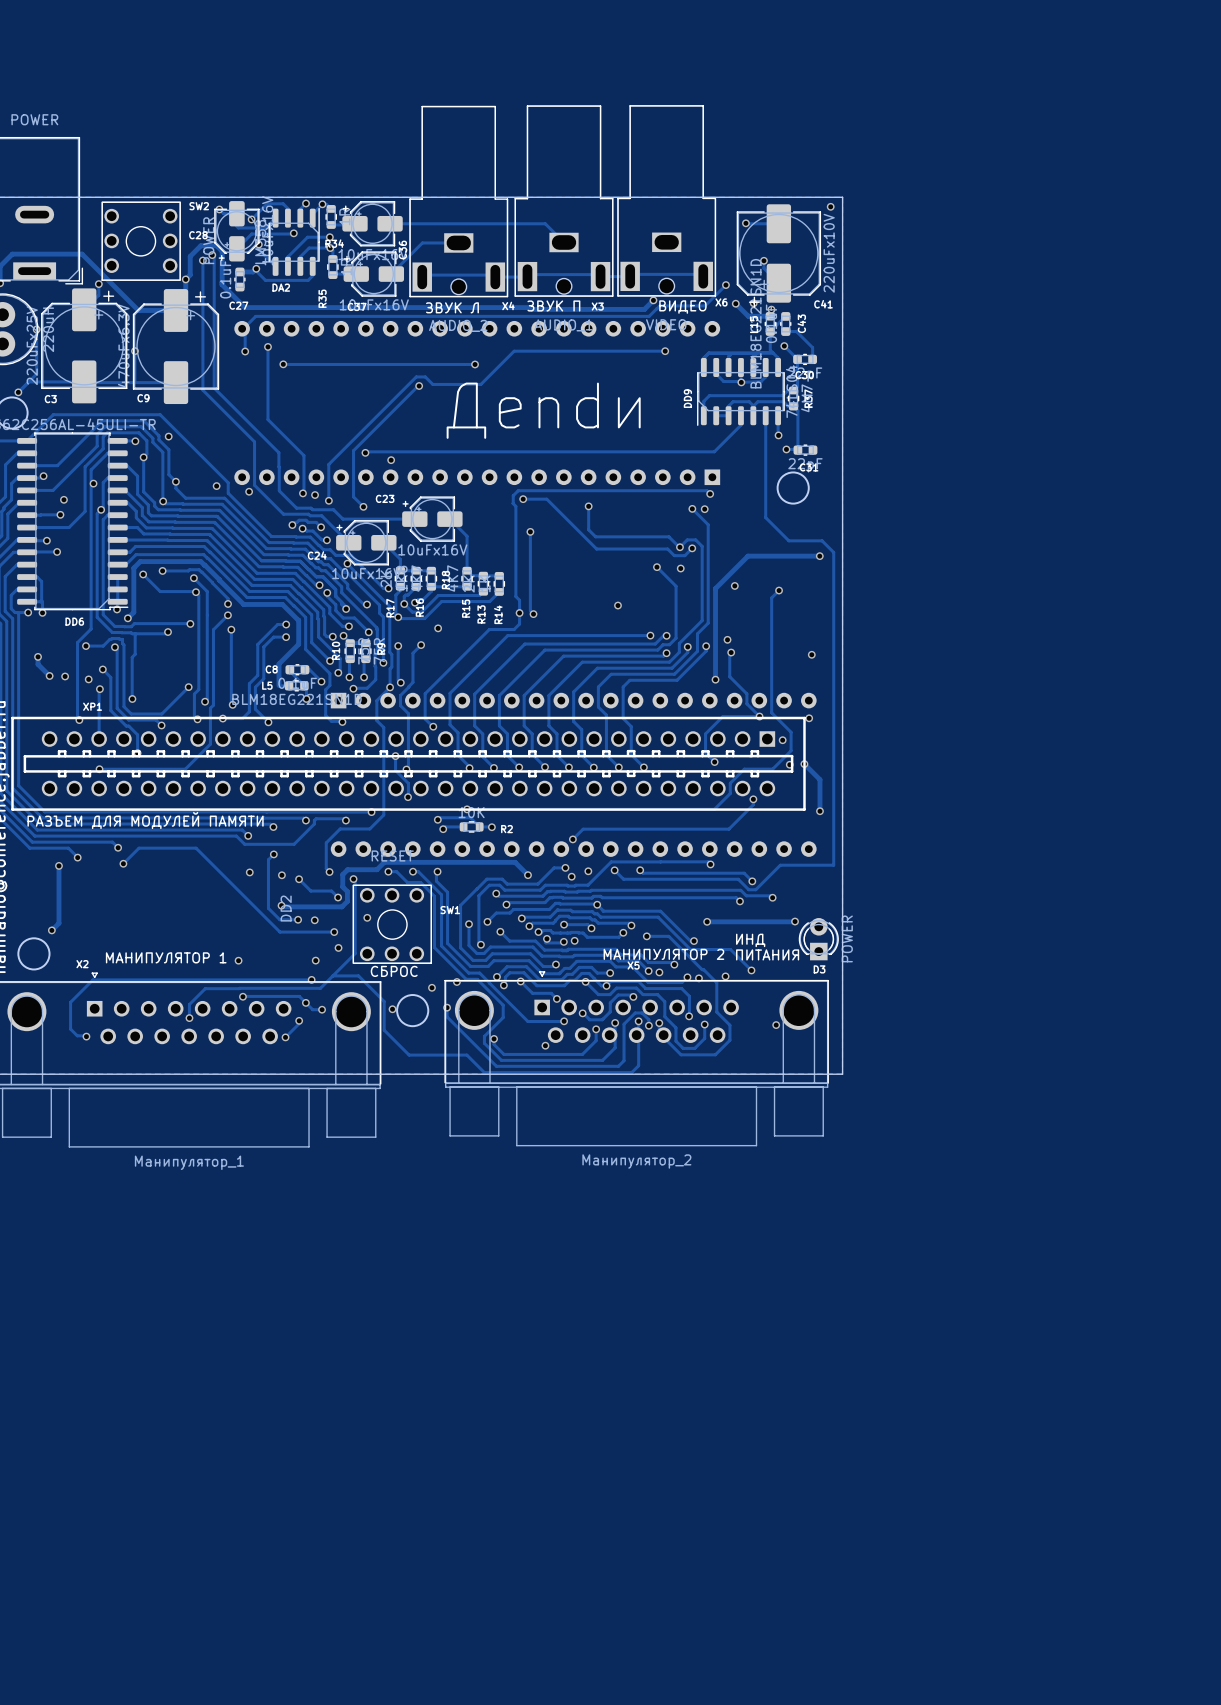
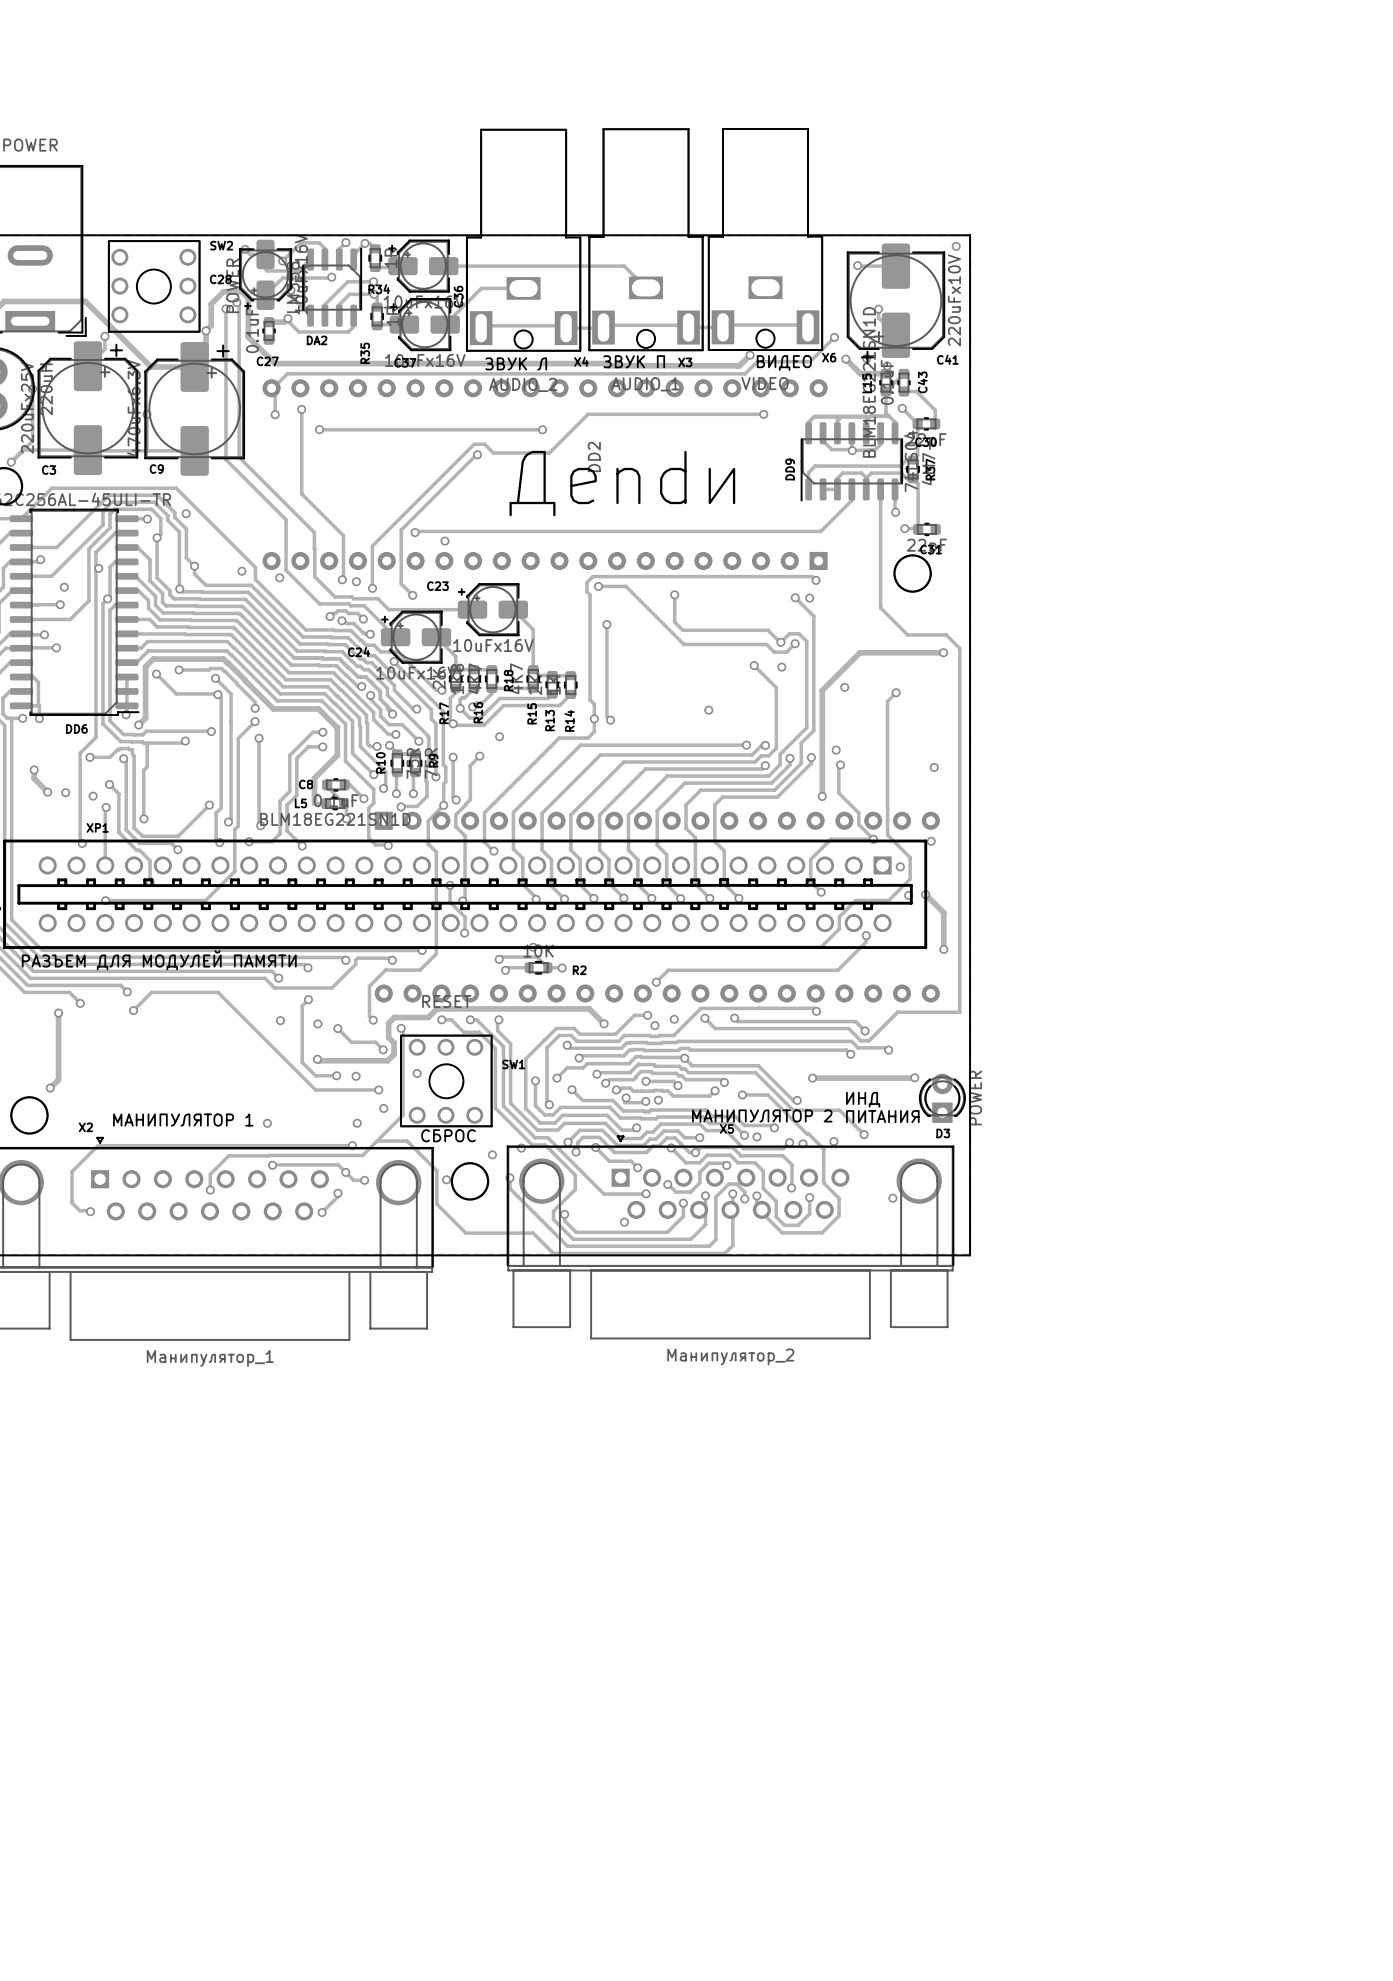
DD2 name position: DD2 (286, 908) -> DD2 (594, 456)

